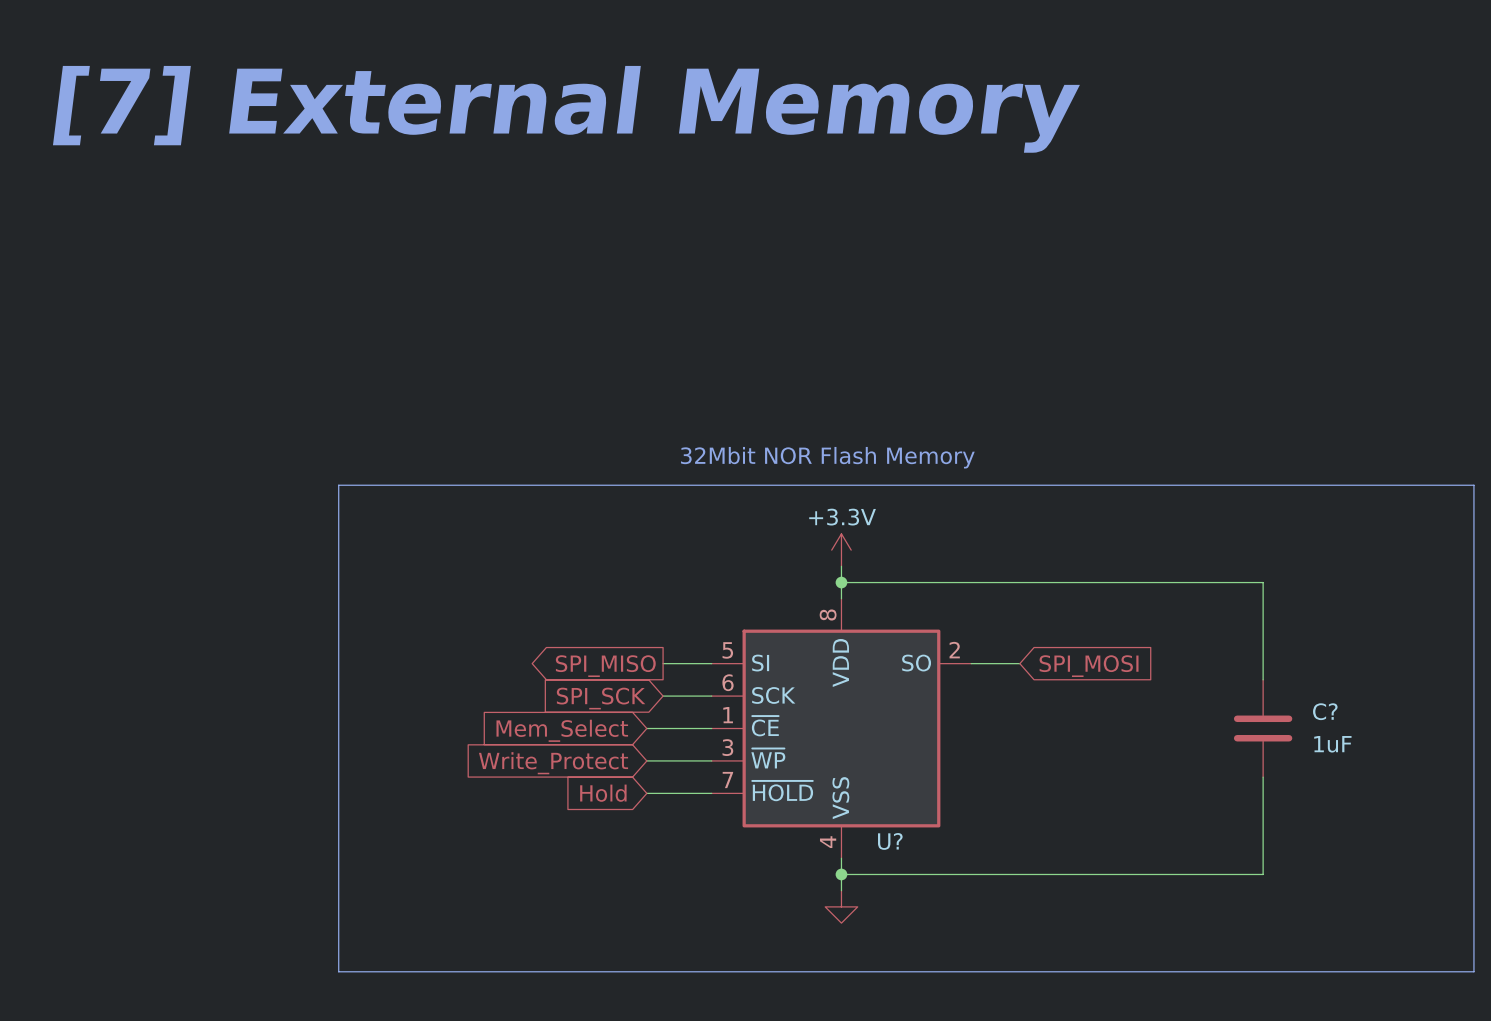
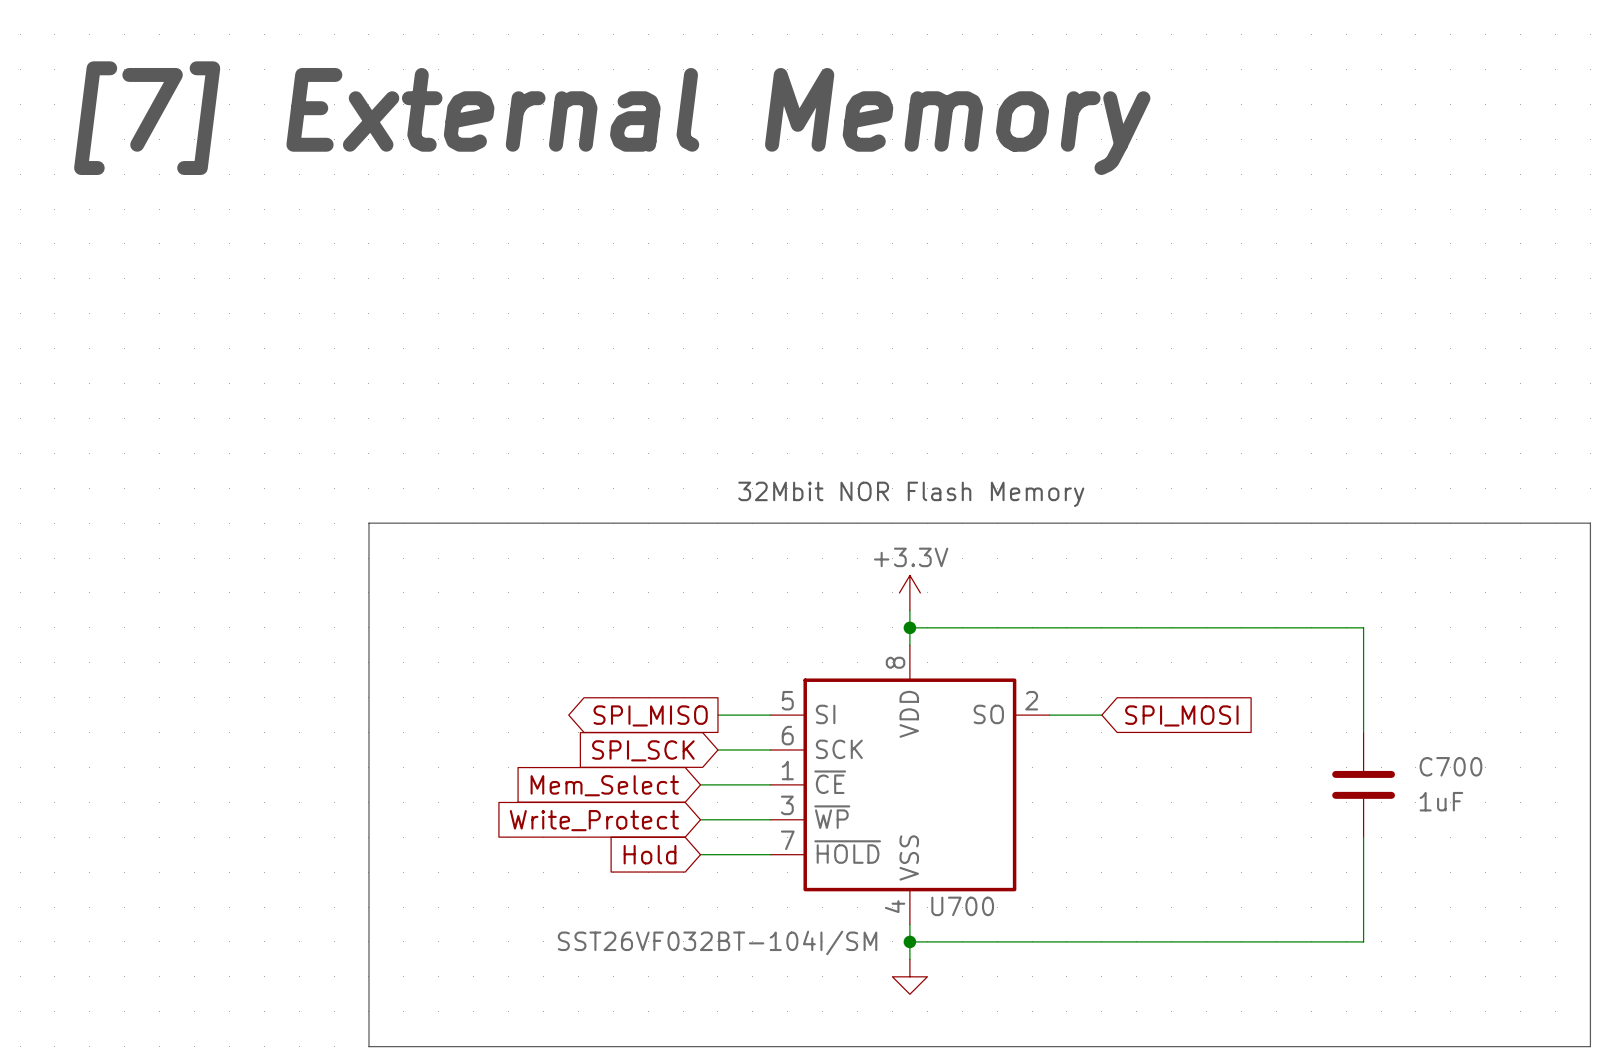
C? name: C? (1325, 711) -> C700 (1450, 766)
U? name: U? (890, 841) -> U700 (962, 906)
U? value: none -> SST26VF032BT-104I/SM (717, 942)

